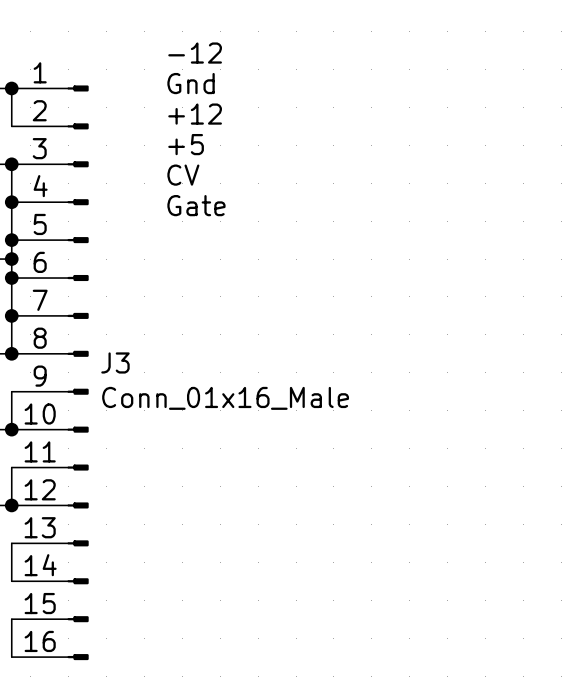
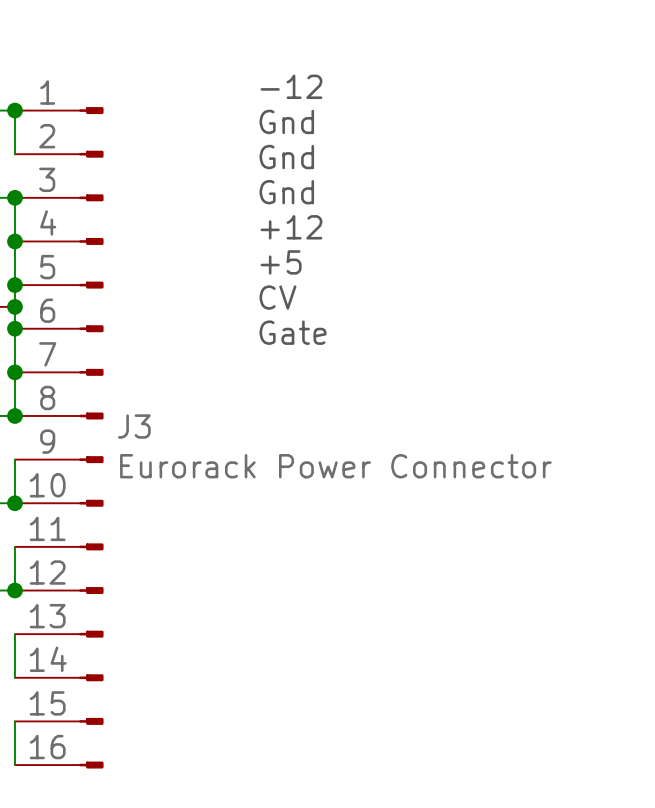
text position: -12 (195, 53) -> -12 (291, 86)
text position: Gnd (191, 83) -> Gnd (286, 121)
text position: +12 (195, 114) -> +12 (291, 227)
text: none -> Gnd (286, 157)
text position: +5 (186, 144) -> +5 (281, 262)
text: none -> Gnd (286, 192)
text position: CV (183, 175) -> CV (277, 297)
text position: Gate (196, 205) -> Gate (293, 332)
J3 value: Conn_01x16_Male (225, 398) -> Eurorack Power Connector (335, 466)

